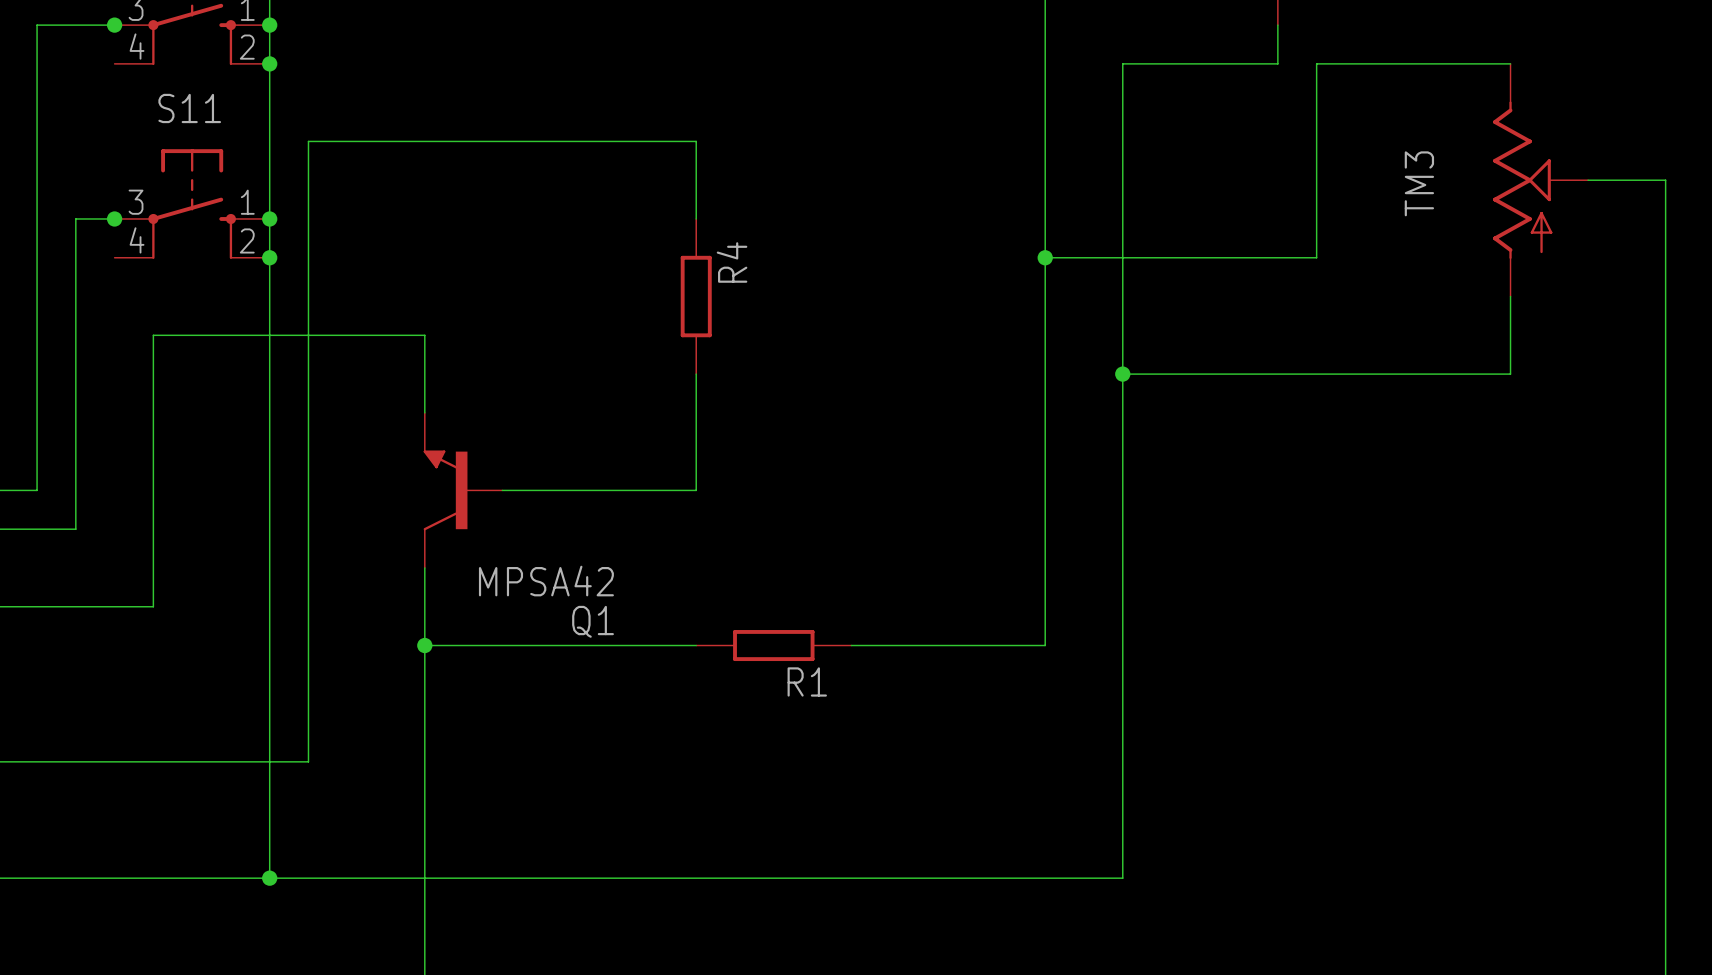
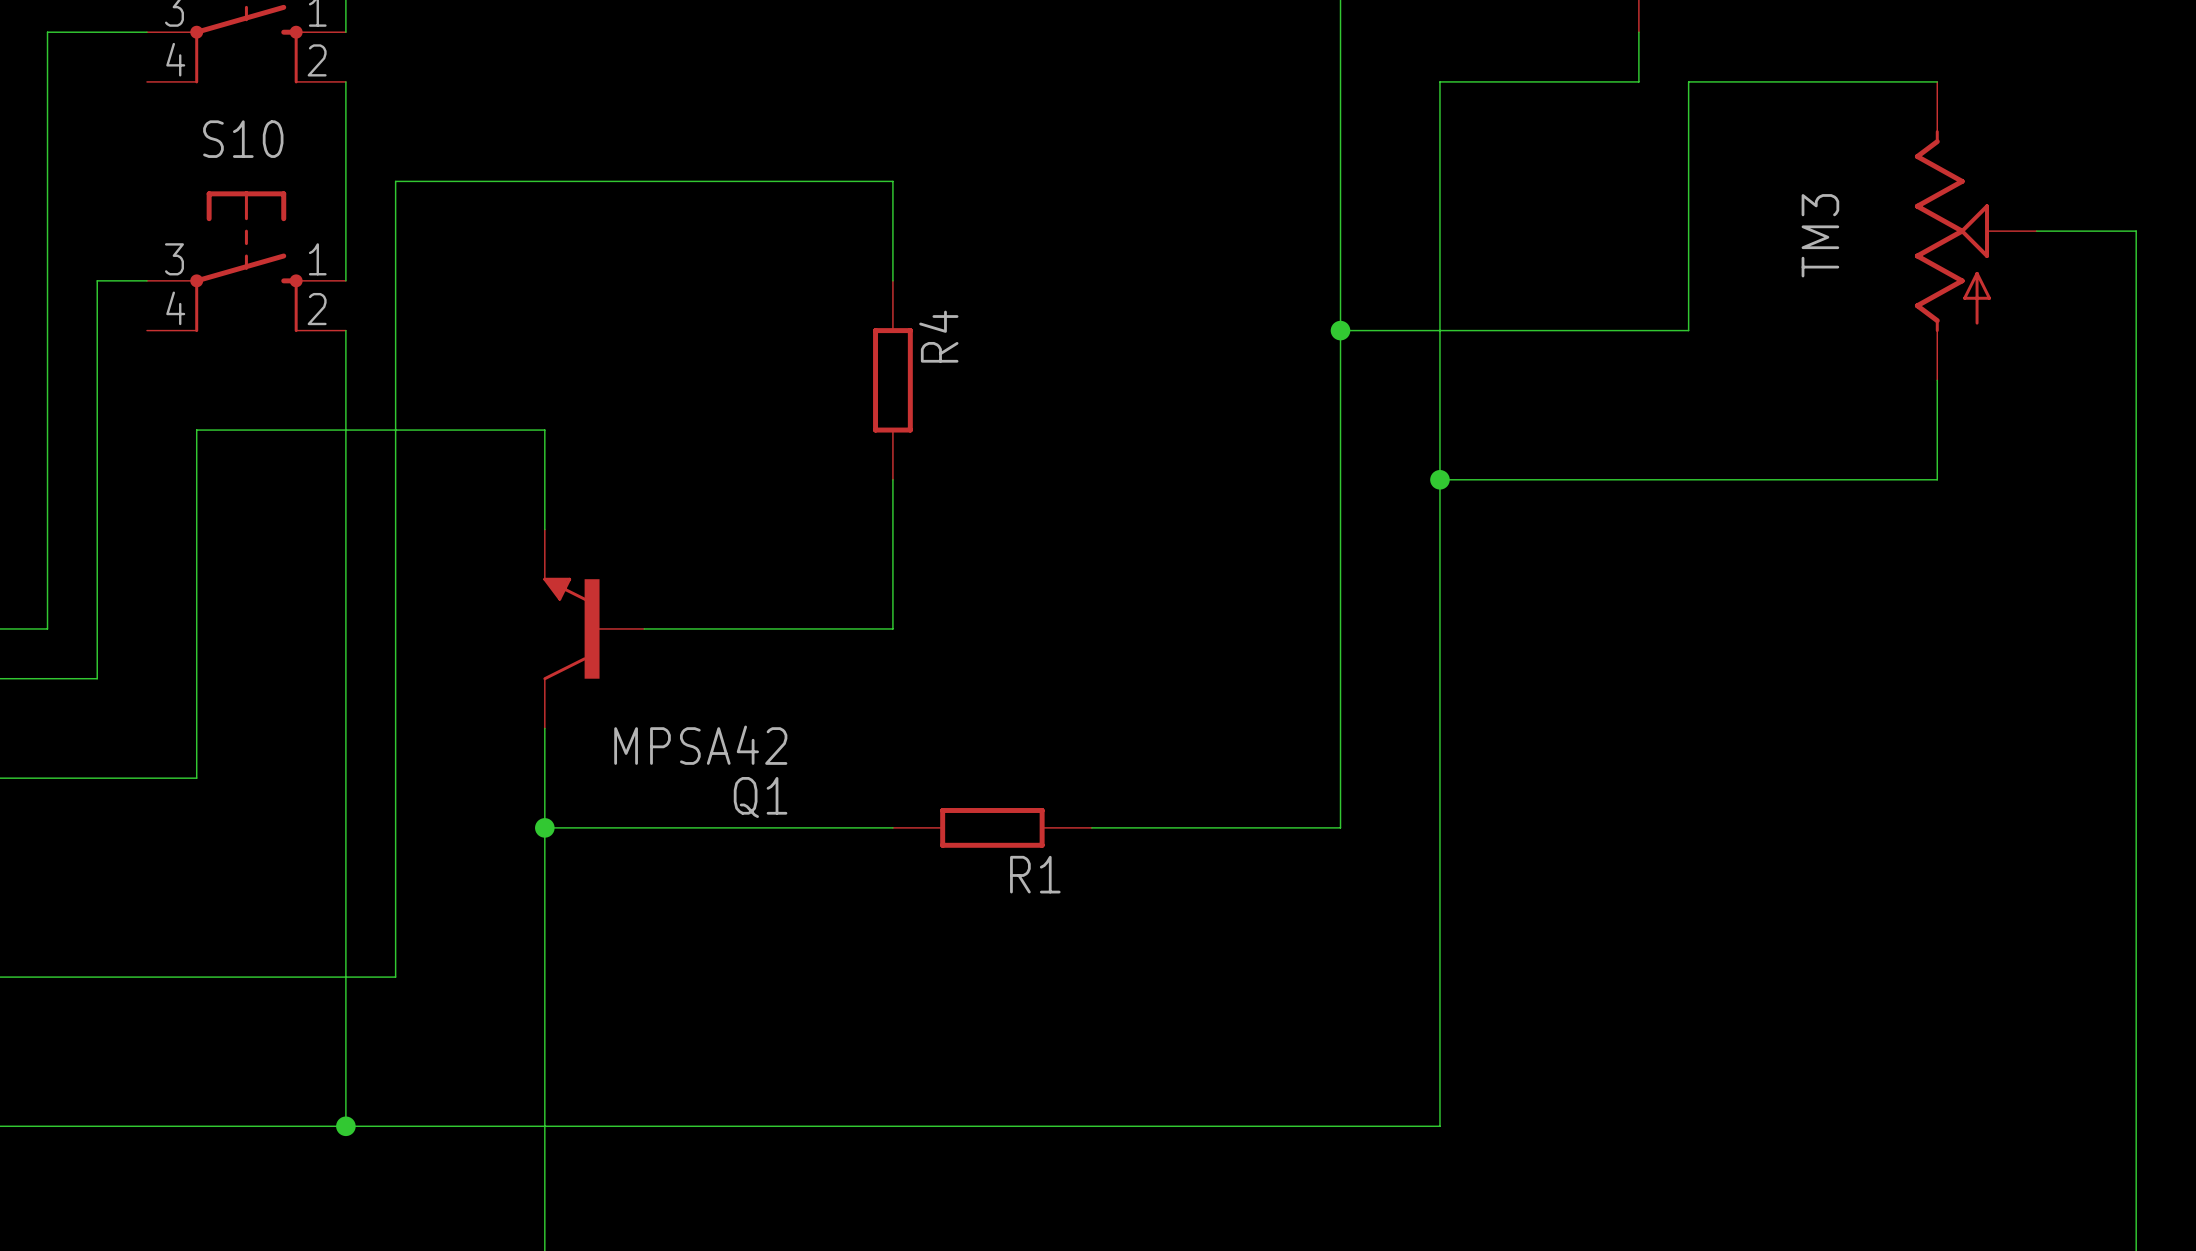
junction: (114, 25) -> none
wire: (269, 25) (269, 63) -> none
junction: (269, 25) -> none
junction: (269, 63) -> none
S11 name: S11 (189, 108) -> S10 (243, 139)
junction: (114, 218) -> none
wire: (269, 218) (269, 257) -> none
junction: (269, 218) -> none
junction: (269, 257) -> none

